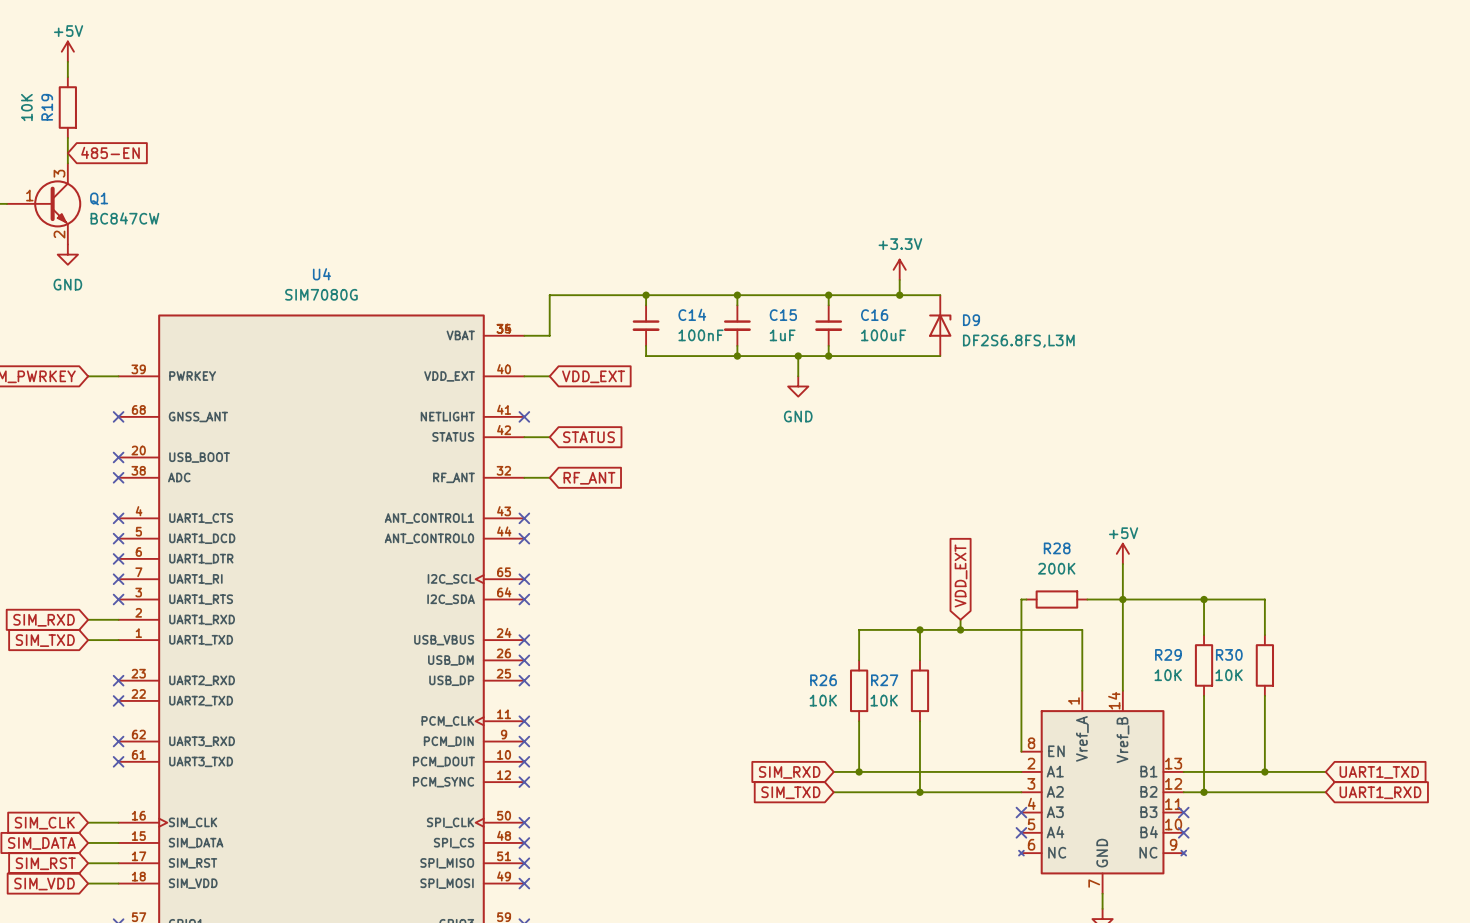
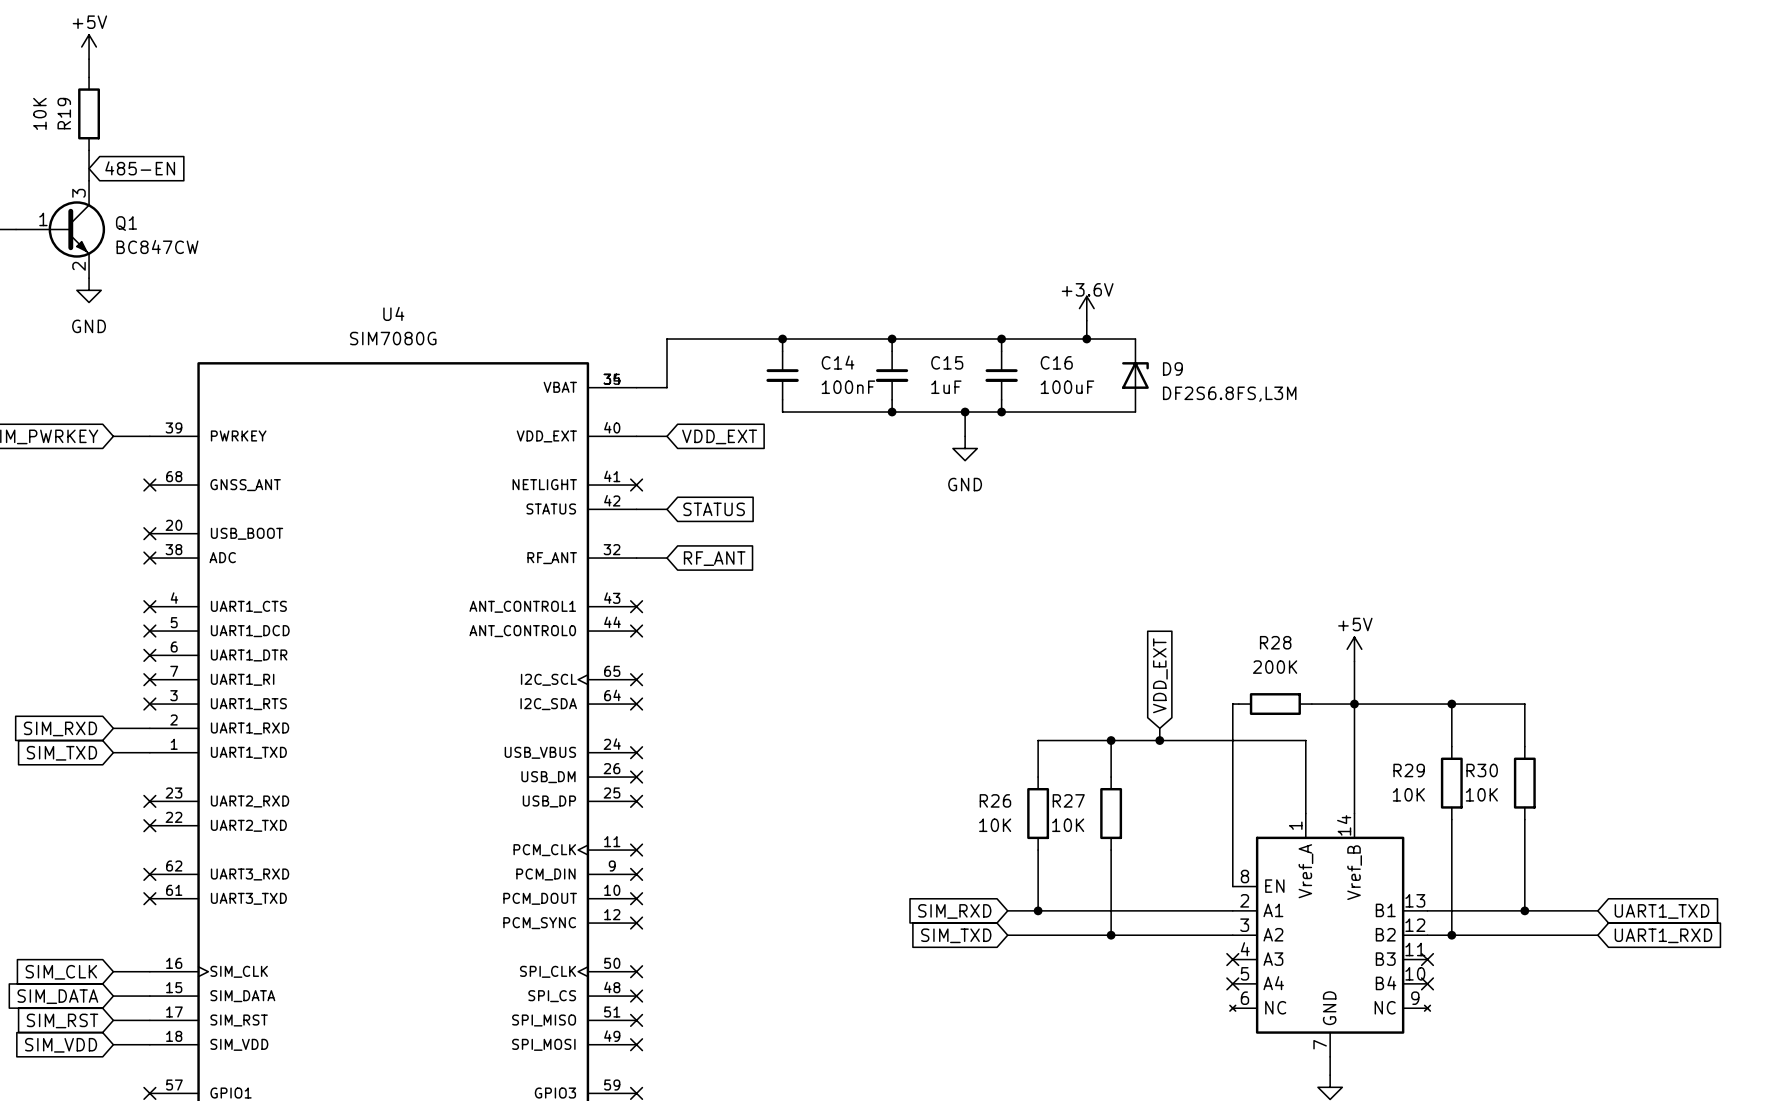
power symbol: +3.3V (899, 269) -> +3.6V (1086, 308)

